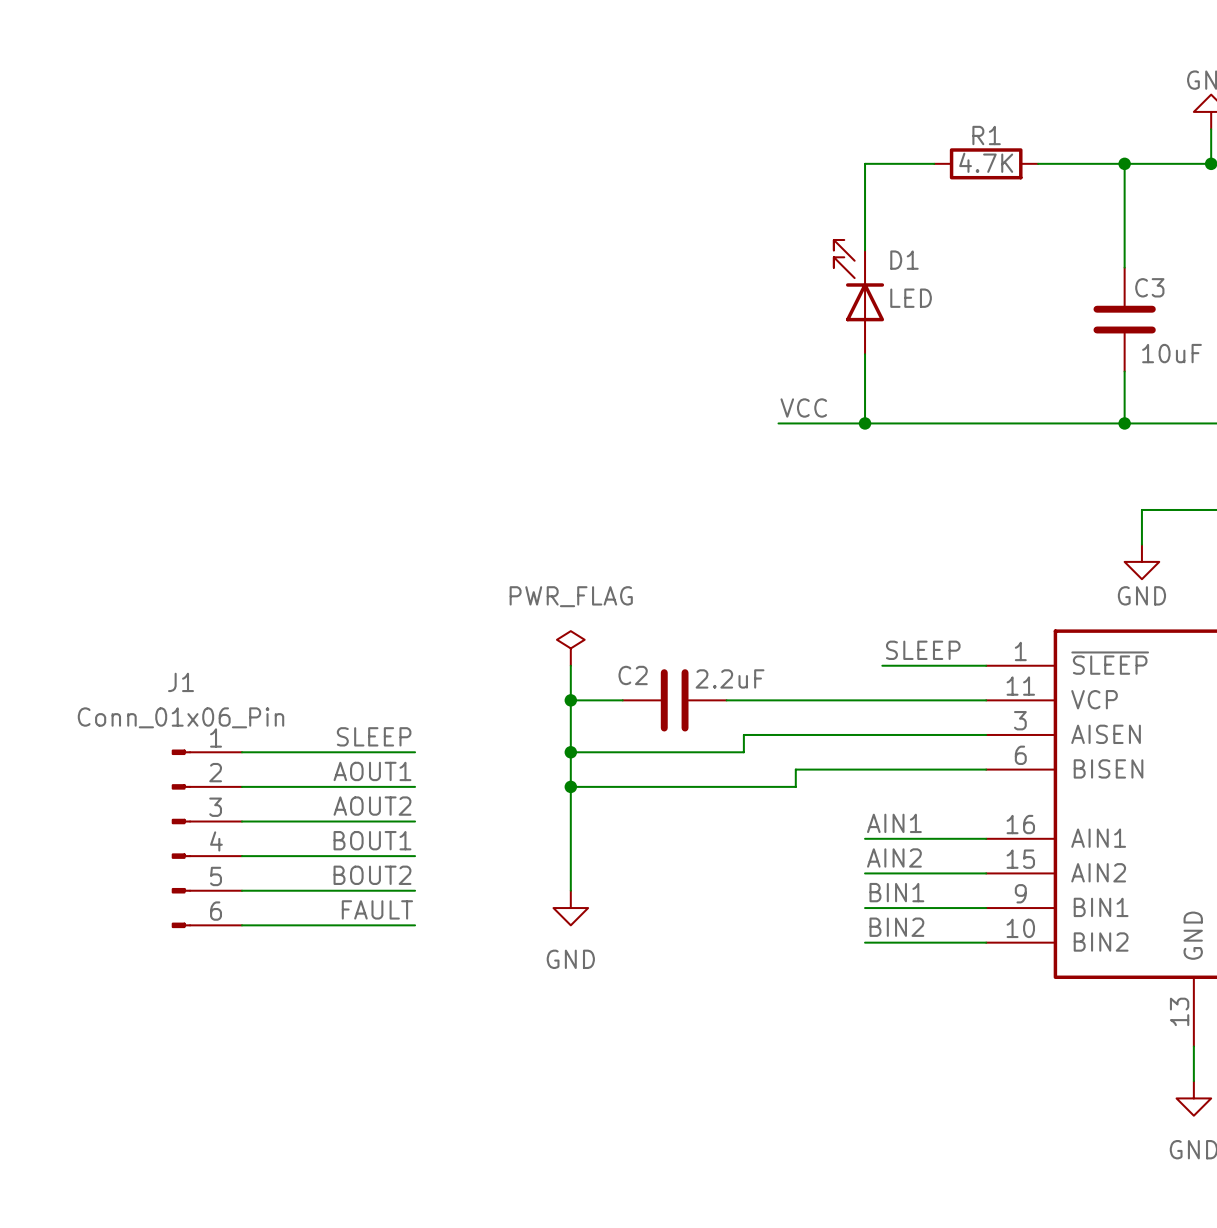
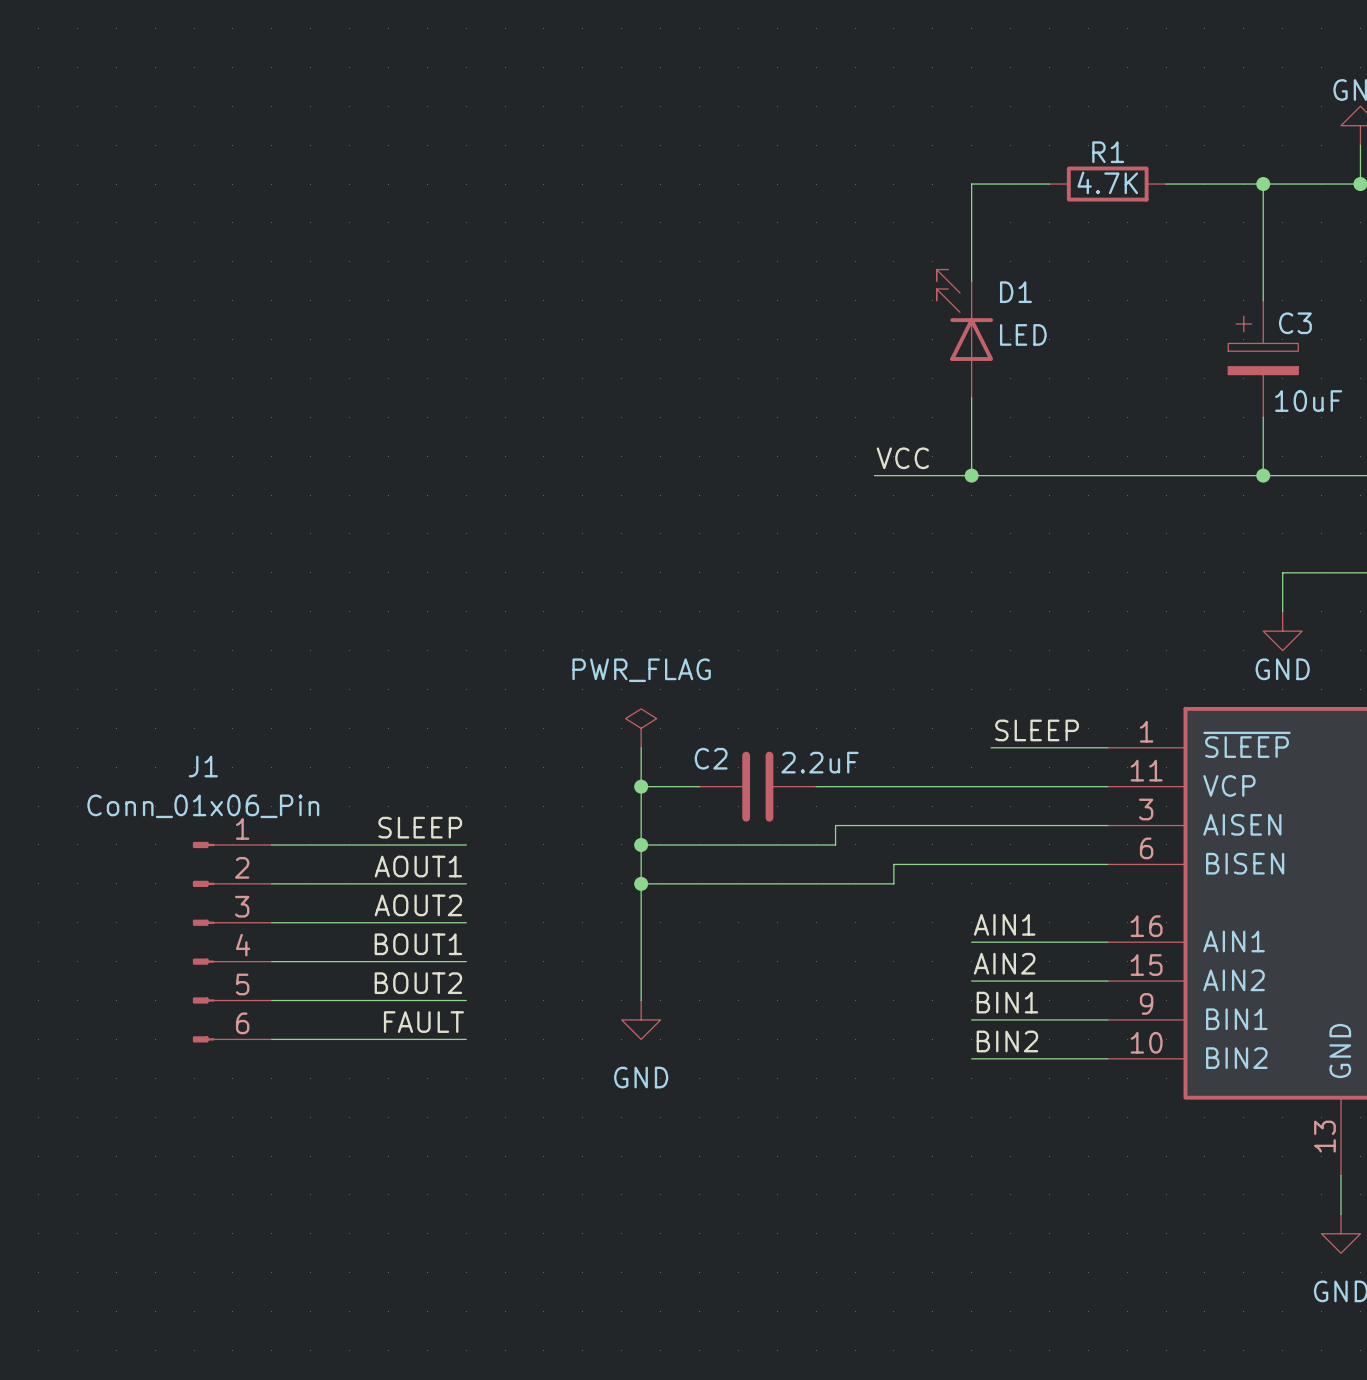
C3 symbol: [1093, 267, 1156, 372] -> [1228, 300, 1299, 418]

